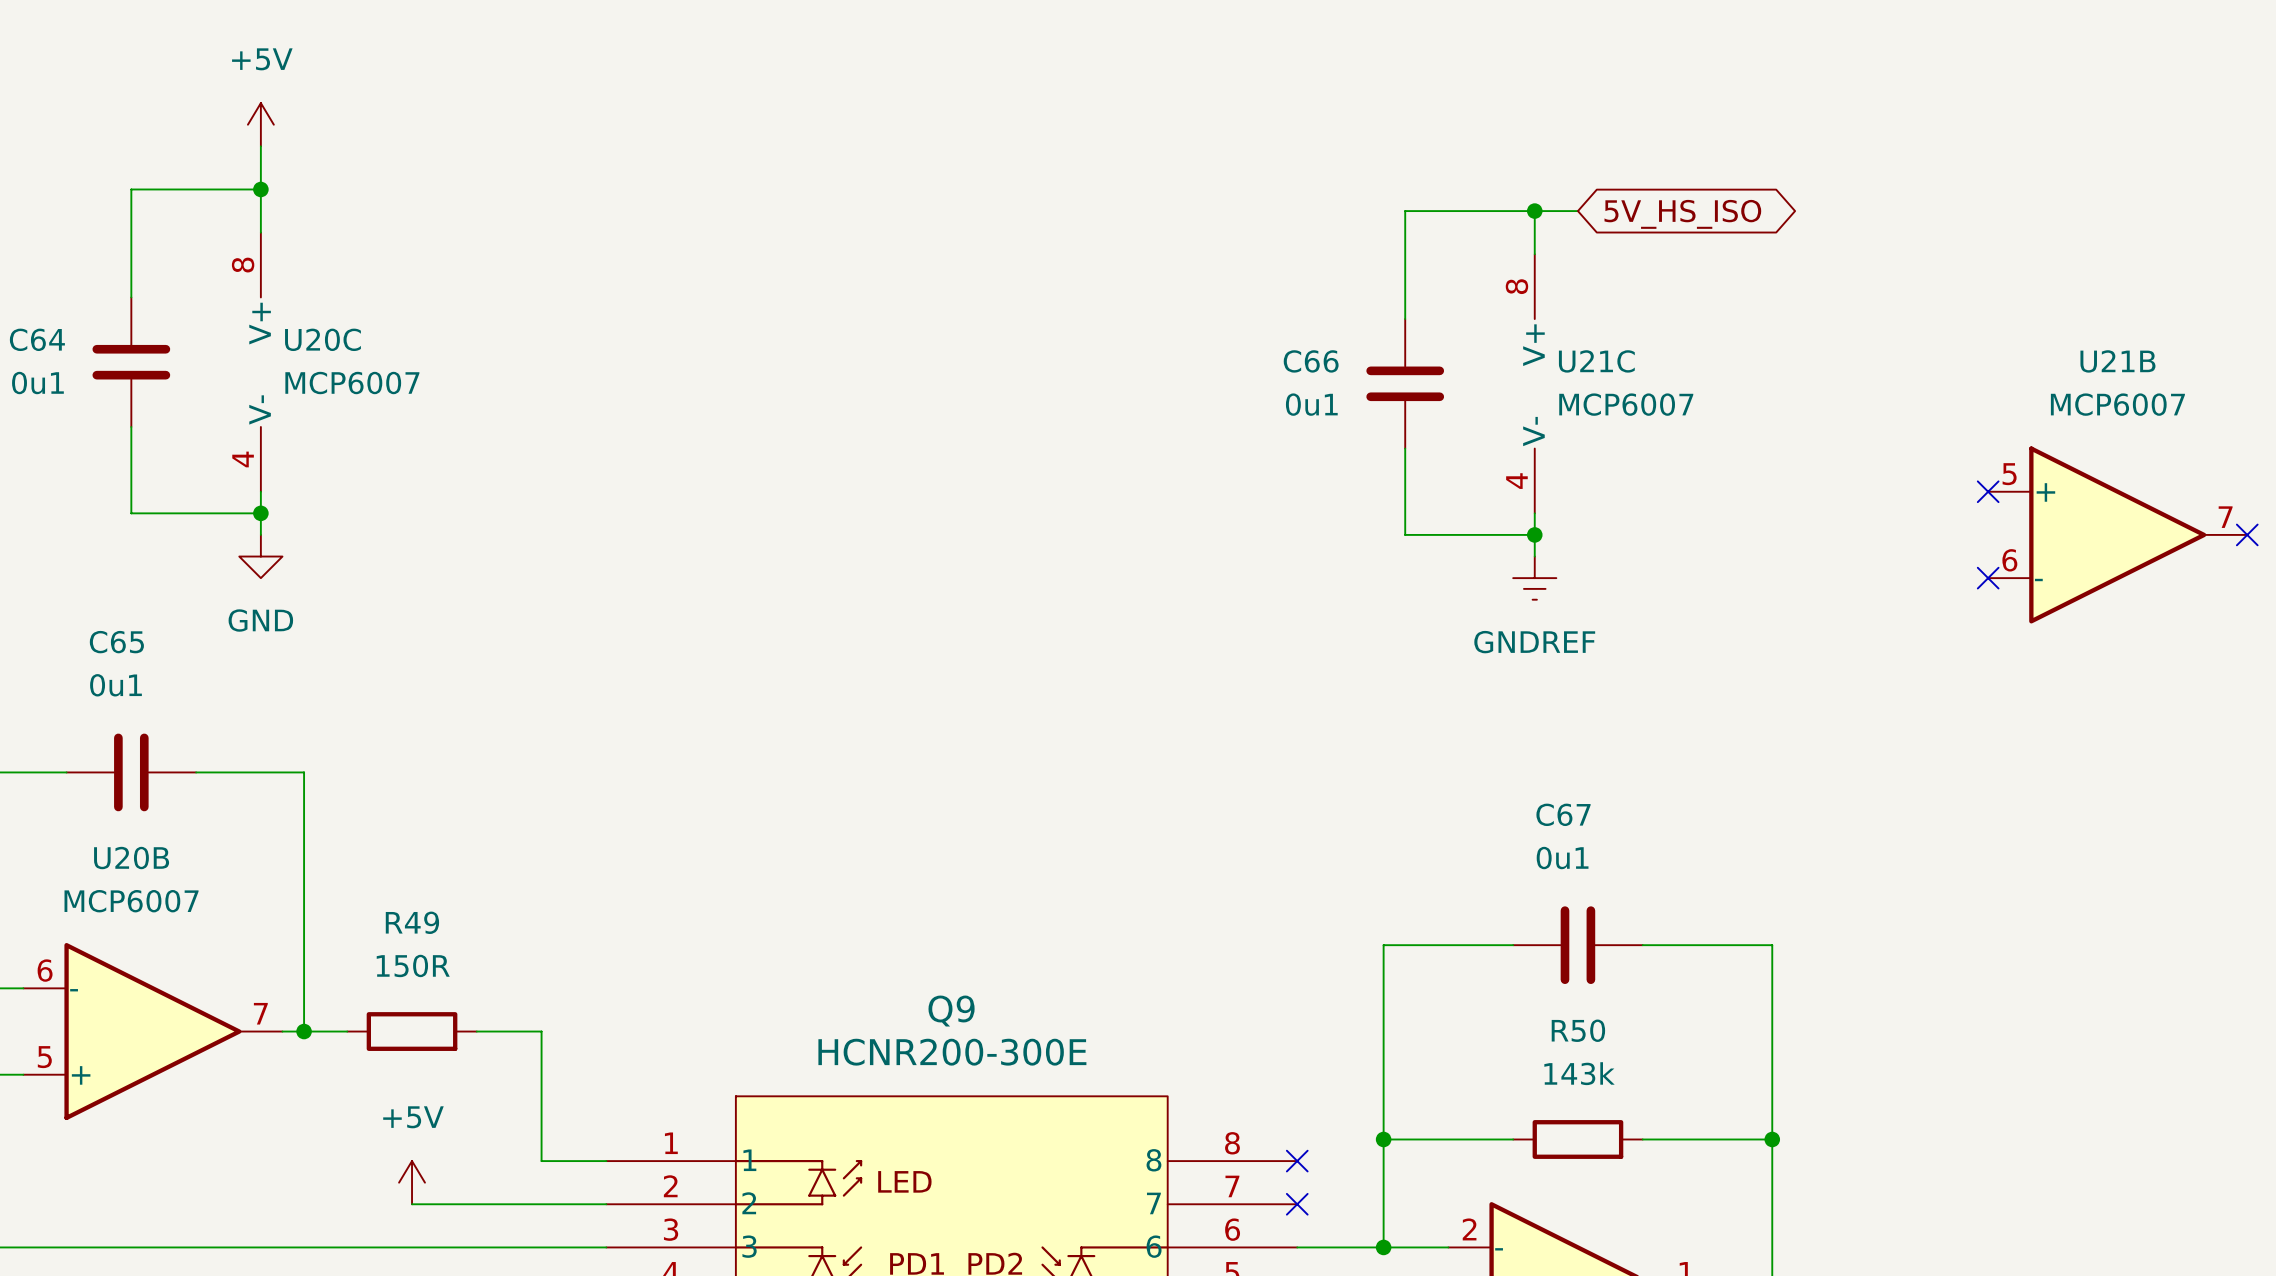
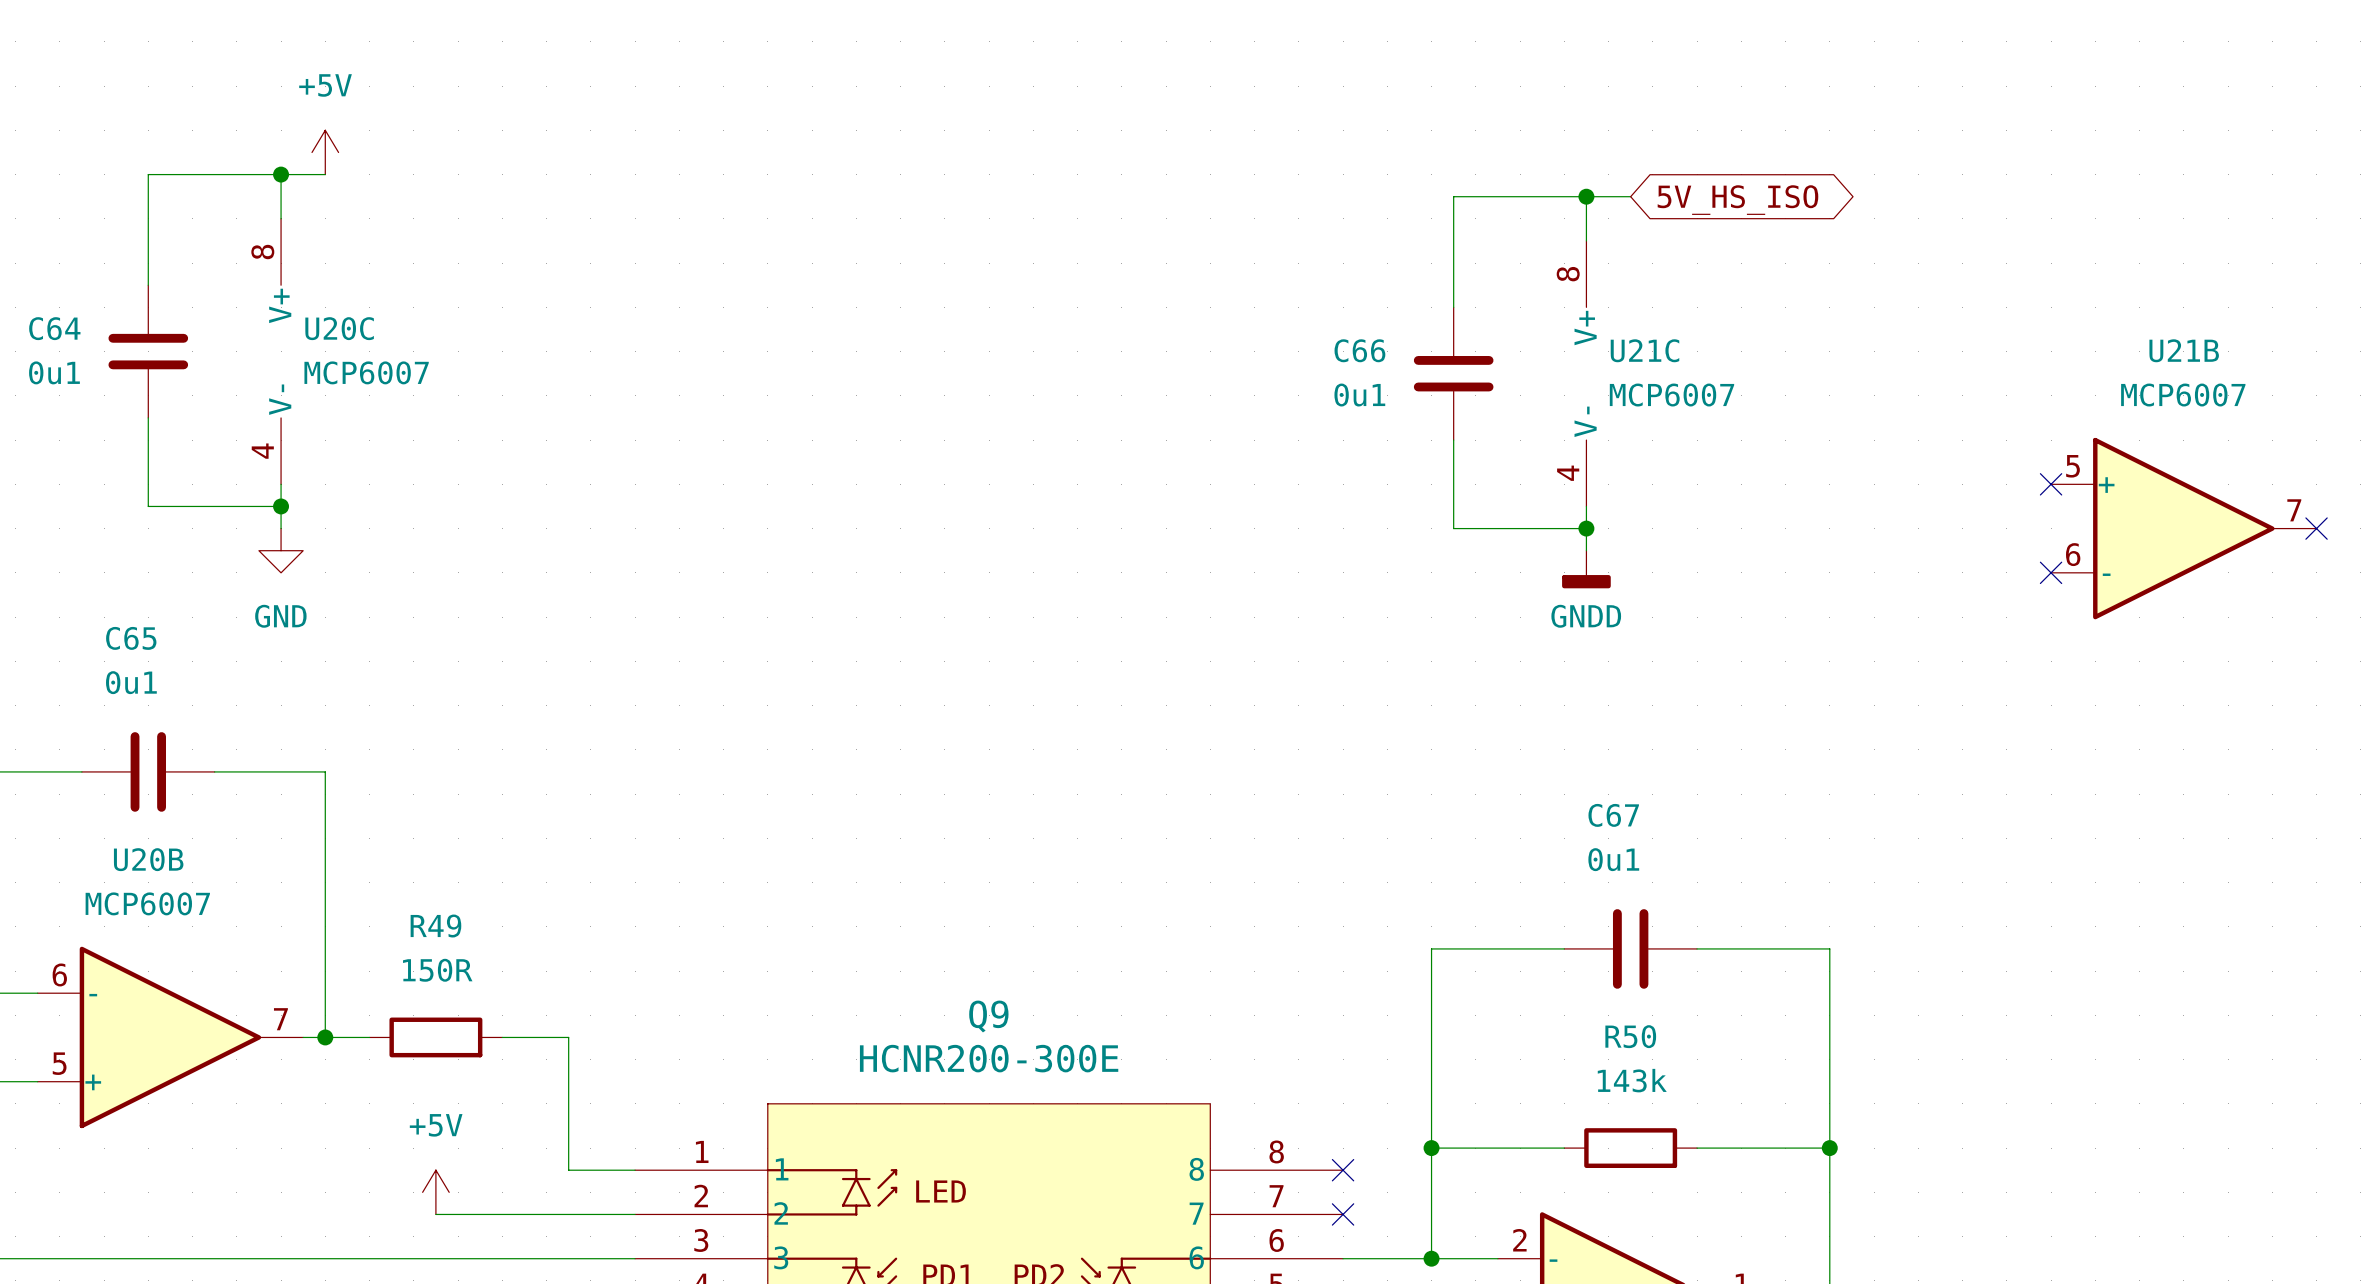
power symbol position: +5V (260, 124) -> +5V (325, 152)
wire: (260, 146) (260, 189) -> (325, 174) (281, 174)
power symbol: GNDREF (1534, 578) -> GNDD (1586, 569)

